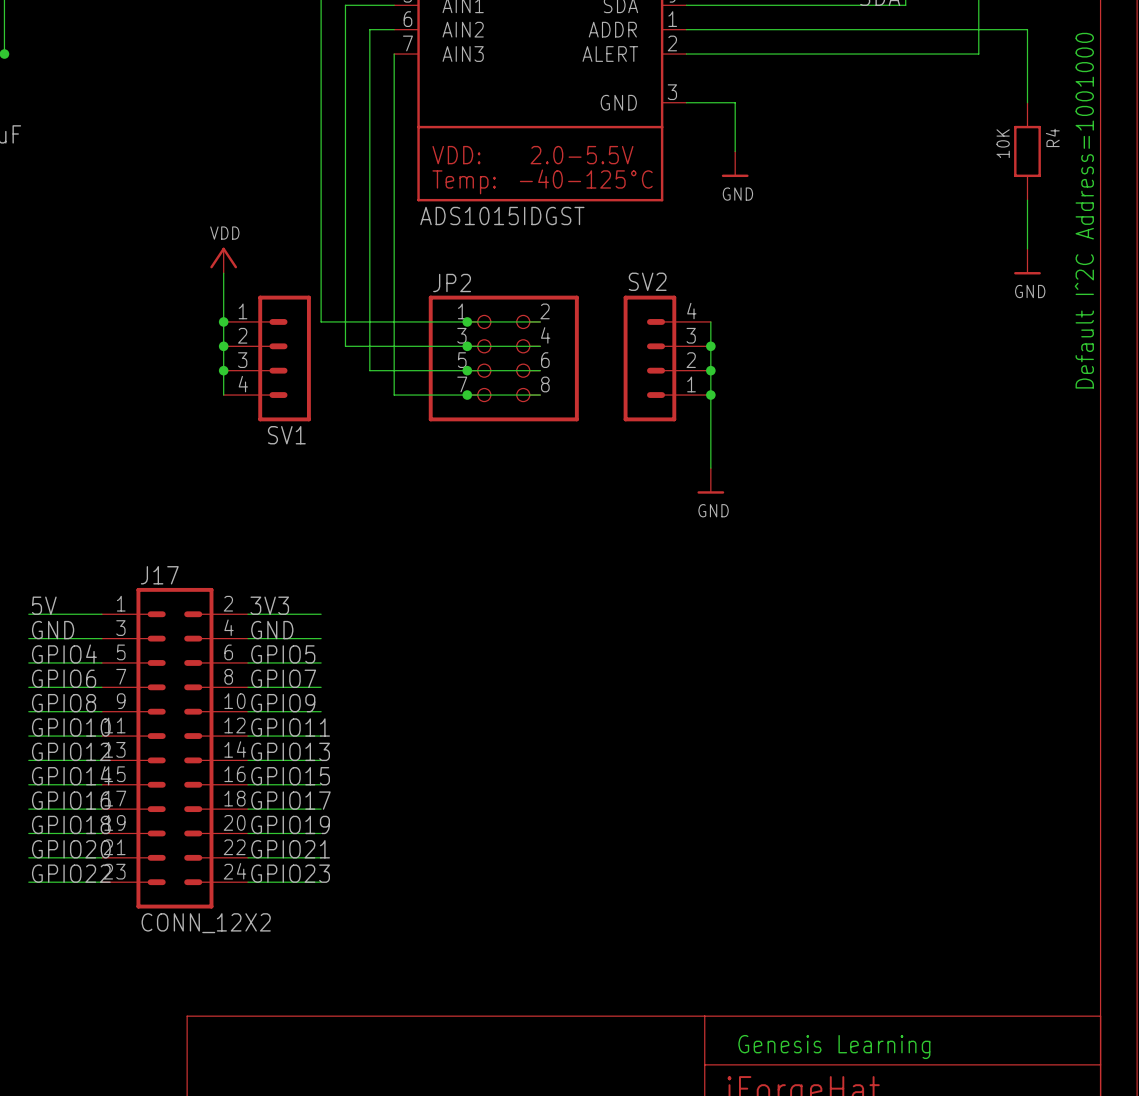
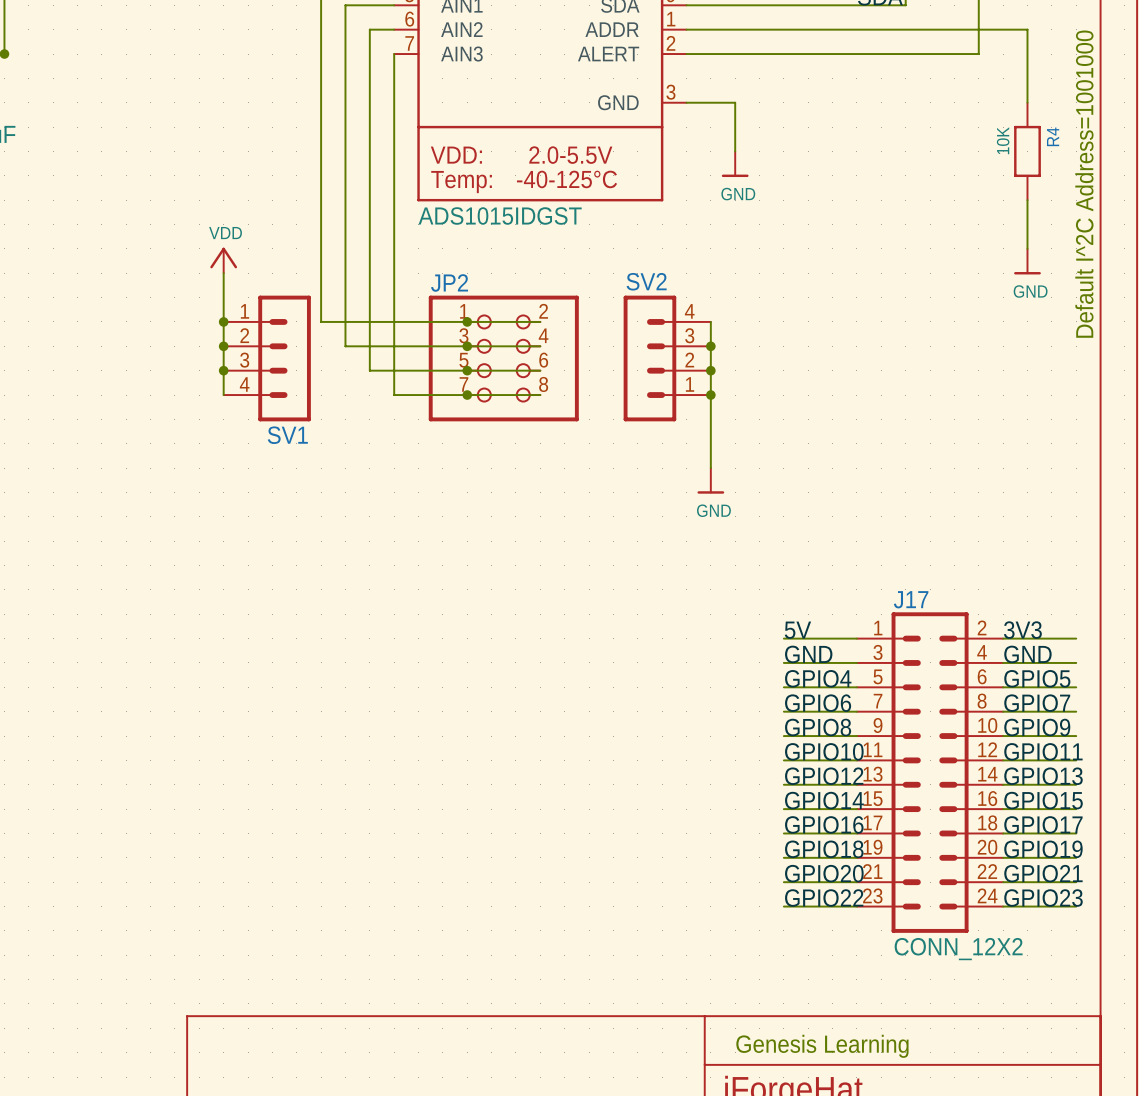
label: 5V (44, 605) -> none
label: 3V3 (269, 605) -> none
wire: (28, 614) (101, 614) -> none
wire: (248, 614) (321, 614) -> none
label: GND (53, 630) -> none
label: GND (272, 630) -> none
label: none -> 5V (797, 630)
label: none -> 3V3 (1022, 630)
wire: (28, 638) (101, 638) -> none
wire: (248, 638) (321, 638) -> none
wire: none -> (783, 638) (856, 638)
wire: none -> (1003, 638) (1076, 638)
label: GPIO4 (64, 654) -> none
label: GPIO5 (283, 654) -> none
label: none -> GND (808, 654)
label: none -> GND (1027, 654)
wire: (28, 662) (101, 662) -> none
wire: (248, 662) (321, 662) -> none
wire: none -> (783, 662) (856, 662)
wire: none -> (1003, 662) (1076, 662)
label: GPIO6 (64, 678) -> none
label: GPIO7 (283, 678) -> none
label: none -> GPIO4 (818, 678)
label: none -> GPIO5 (1037, 678)
wire: (28, 687) (101, 687) -> none
wire: (248, 687) (321, 687) -> none
wire: none -> (783, 687) (856, 687)
wire: none -> (1003, 687) (1076, 687)
label: GPIO8 (64, 703) -> none
label: GPIO9 (283, 703) -> none
label: none -> GPIO6 (818, 703)
label: none -> GPIO7 (1037, 703)
wire: (28, 711) (101, 711) -> none
wire: (248, 711) (321, 711) -> none
wire: none -> (783, 711) (856, 711)
wire: none -> (1003, 711) (1076, 711)
label: GPIO10 (71, 727) -> none
label: GPIO11 (290, 727) -> none
label: none -> GPIO8 (818, 727)
label: none -> GPIO9 (1037, 727)
wire: (28, 736) (101, 736) -> none
wire: (248, 736) (321, 736) -> none
wire: none -> (783, 736) (856, 736)
wire: none -> (1003, 736) (1076, 736)
J17 position: (174, 748) -> (930, 772)
label: GPIO12 (71, 751) -> none
label: GPIO13 (290, 751) -> none
label: none -> GPIO10 (824, 751)
label: none -> GPIO11 (1043, 751)
wire: (28, 760) (101, 760) -> none
wire: (248, 760) (321, 760) -> none
wire: none -> (783, 760) (856, 760)
wire: none -> (1003, 760) (1076, 760)
label: GPIO14 (71, 775) -> none
label: GPIO15 (290, 776) -> none
label: none -> GPIO12 (824, 776)
label: none -> GPIO13 (1043, 776)
wire: (28, 784) (101, 784) -> none
wire: (248, 784) (321, 784) -> none
wire: none -> (783, 784) (856, 784)
wire: none -> (1003, 784) (1076, 784)
label: GPIO16 (71, 800) -> none
label: GPIO17 (290, 800) -> none
label: none -> GPIO14 (824, 800)
label: none -> GPIO15 (1043, 800)
wire: (28, 809) (101, 809) -> none
wire: (248, 809) (321, 809) -> none
wire: none -> (783, 809) (856, 809)
wire: none -> (1003, 809) (1076, 809)
label: GPIO18 (71, 824) -> none
label: GPIO19 (290, 824) -> none
label: none -> GPIO16 (824, 824)
label: none -> GPIO17 (1043, 824)
wire: (28, 833) (101, 833) -> none
wire: (248, 833) (321, 833) -> none
wire: none -> (783, 833) (856, 833)
wire: none -> (1003, 833) (1076, 833)
label: GPIO20 (71, 849) -> none
label: GPIO21 (290, 849) -> none
label: none -> GPIO18 (824, 849)
label: none -> GPIO19 (1043, 849)
wire: (28, 857) (101, 857) -> none
wire: (248, 857) (321, 857) -> none
wire: none -> (783, 857) (856, 857)
wire: none -> (1003, 857) (1076, 857)
label: GPIO22 (71, 873) -> none
label: GPIO23 (290, 873) -> none
label: none -> GPIO20 (824, 873)
label: none -> GPIO21 (1043, 873)
wire: (28, 882) (101, 882) -> none
wire: (248, 882) (321, 882) -> none
wire: none -> (783, 882) (856, 882)
wire: none -> (1003, 882) (1076, 882)
label: none -> GPIO22 (824, 898)
label: none -> GPIO23 (1043, 898)
wire: none -> (783, 906) (856, 906)
wire: none -> (1003, 906) (1076, 906)

